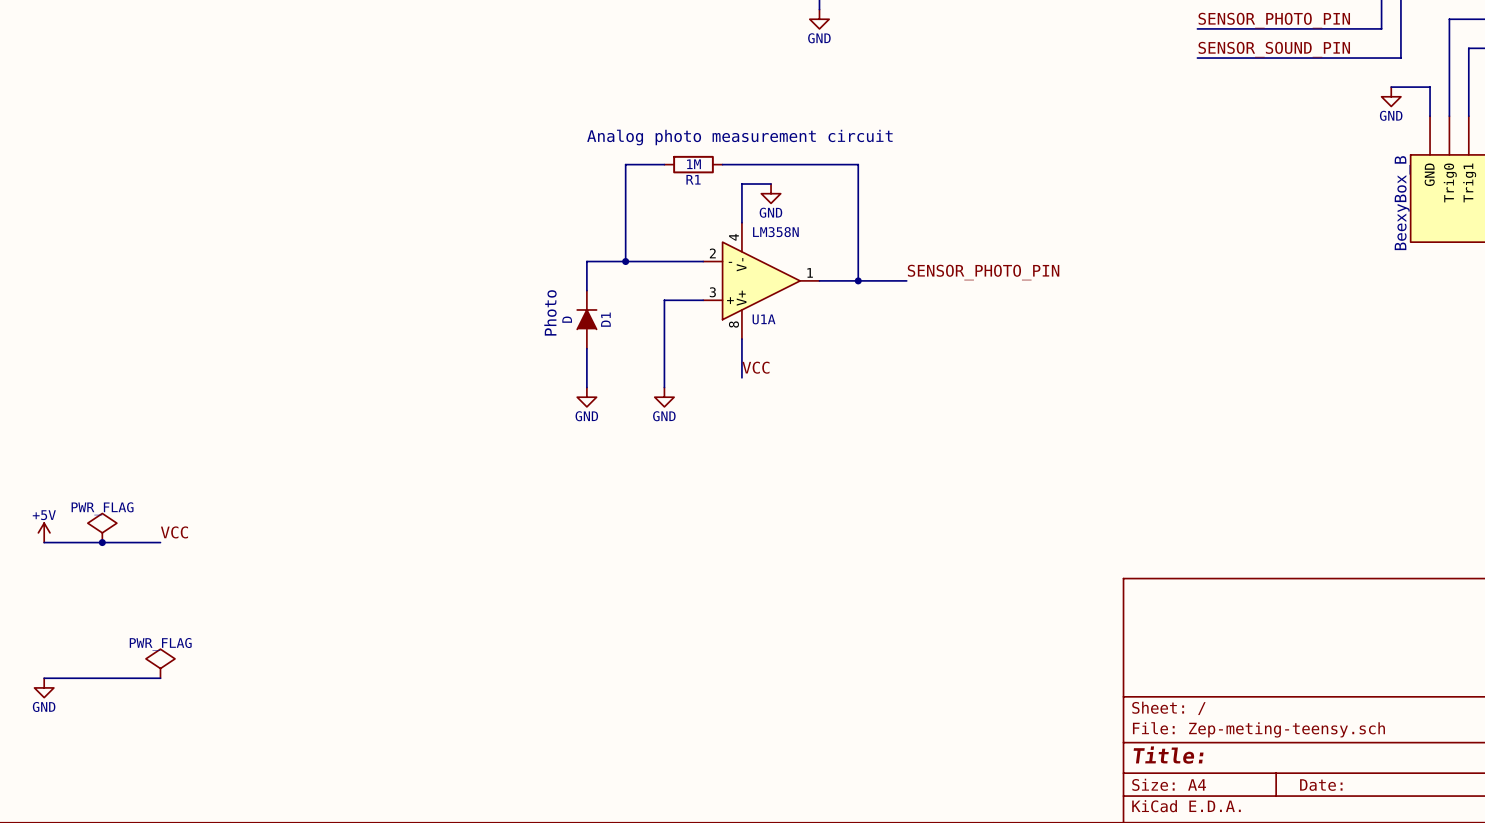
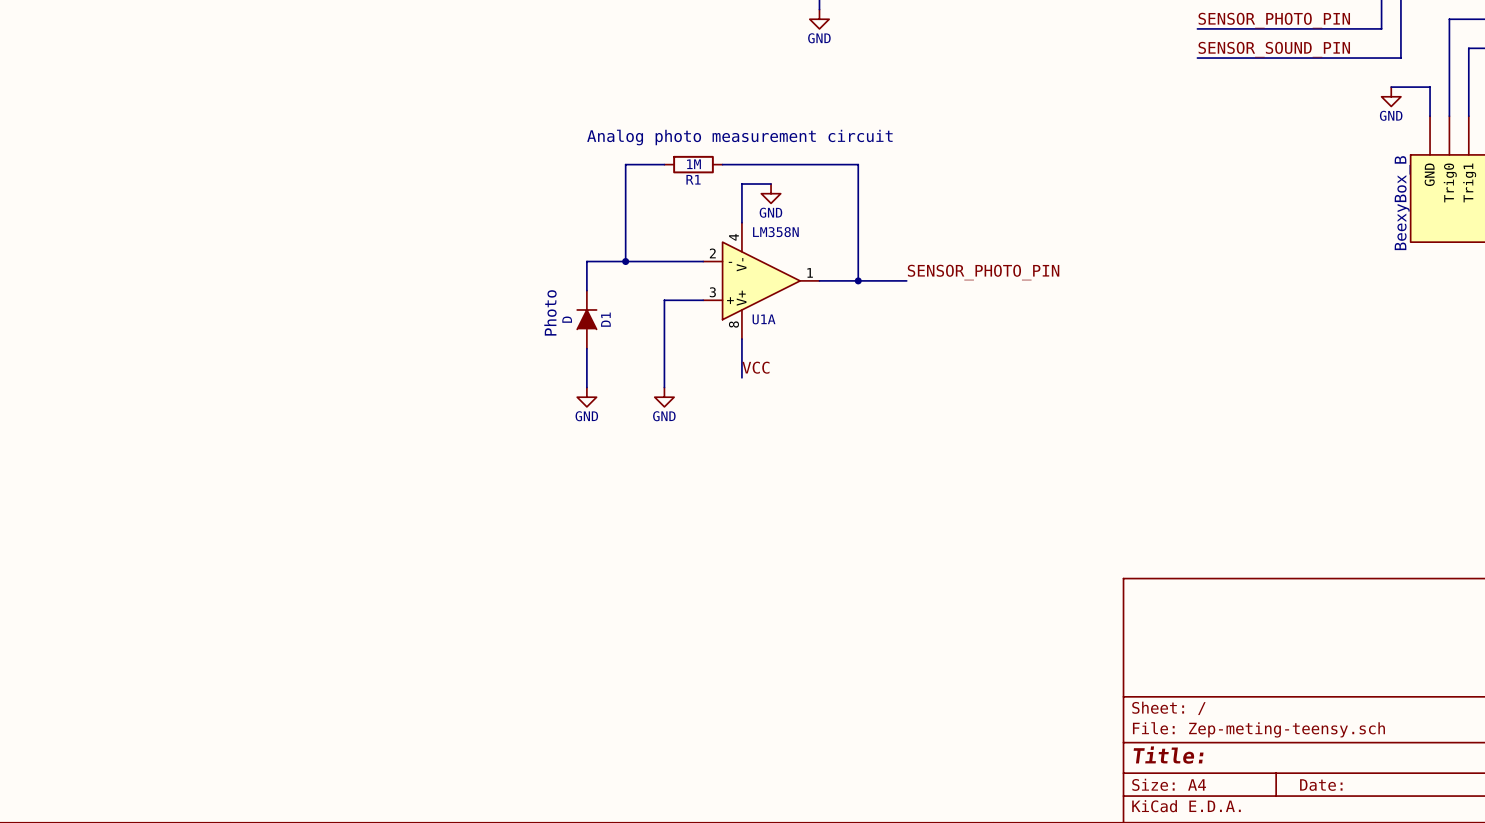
power symbol: PWR_FLAG (102, 528) -> none
power symbol: +5V (44, 532) -> none
label: VCC (174, 532) -> none
wire: (44, 542) (160, 542) -> none
junction: (102, 542) -> none
power symbol: PWR_FLAG (160, 663) -> none
wire: (44, 678) (160, 678) -> none
power symbol: GND (44, 687) -> none

